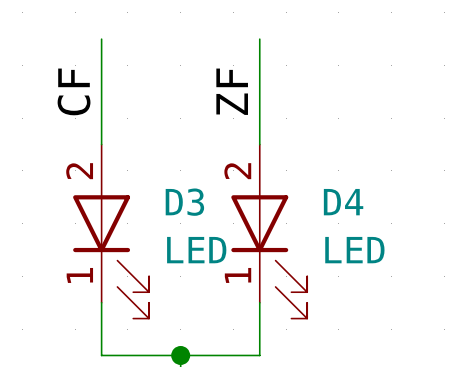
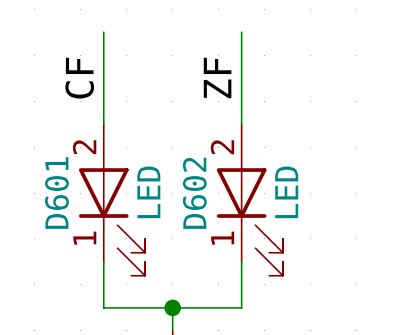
D3 name: D3 (184, 202) -> D601 (56, 193)
D4 name: D4 (343, 202) -> D602 (194, 193)
D3 value rotation: 0° (196, 250) -> 90° counterclockwise (148, 192)
D4 value rotation: 0° (354, 250) -> 90° counterclockwise (286, 192)

